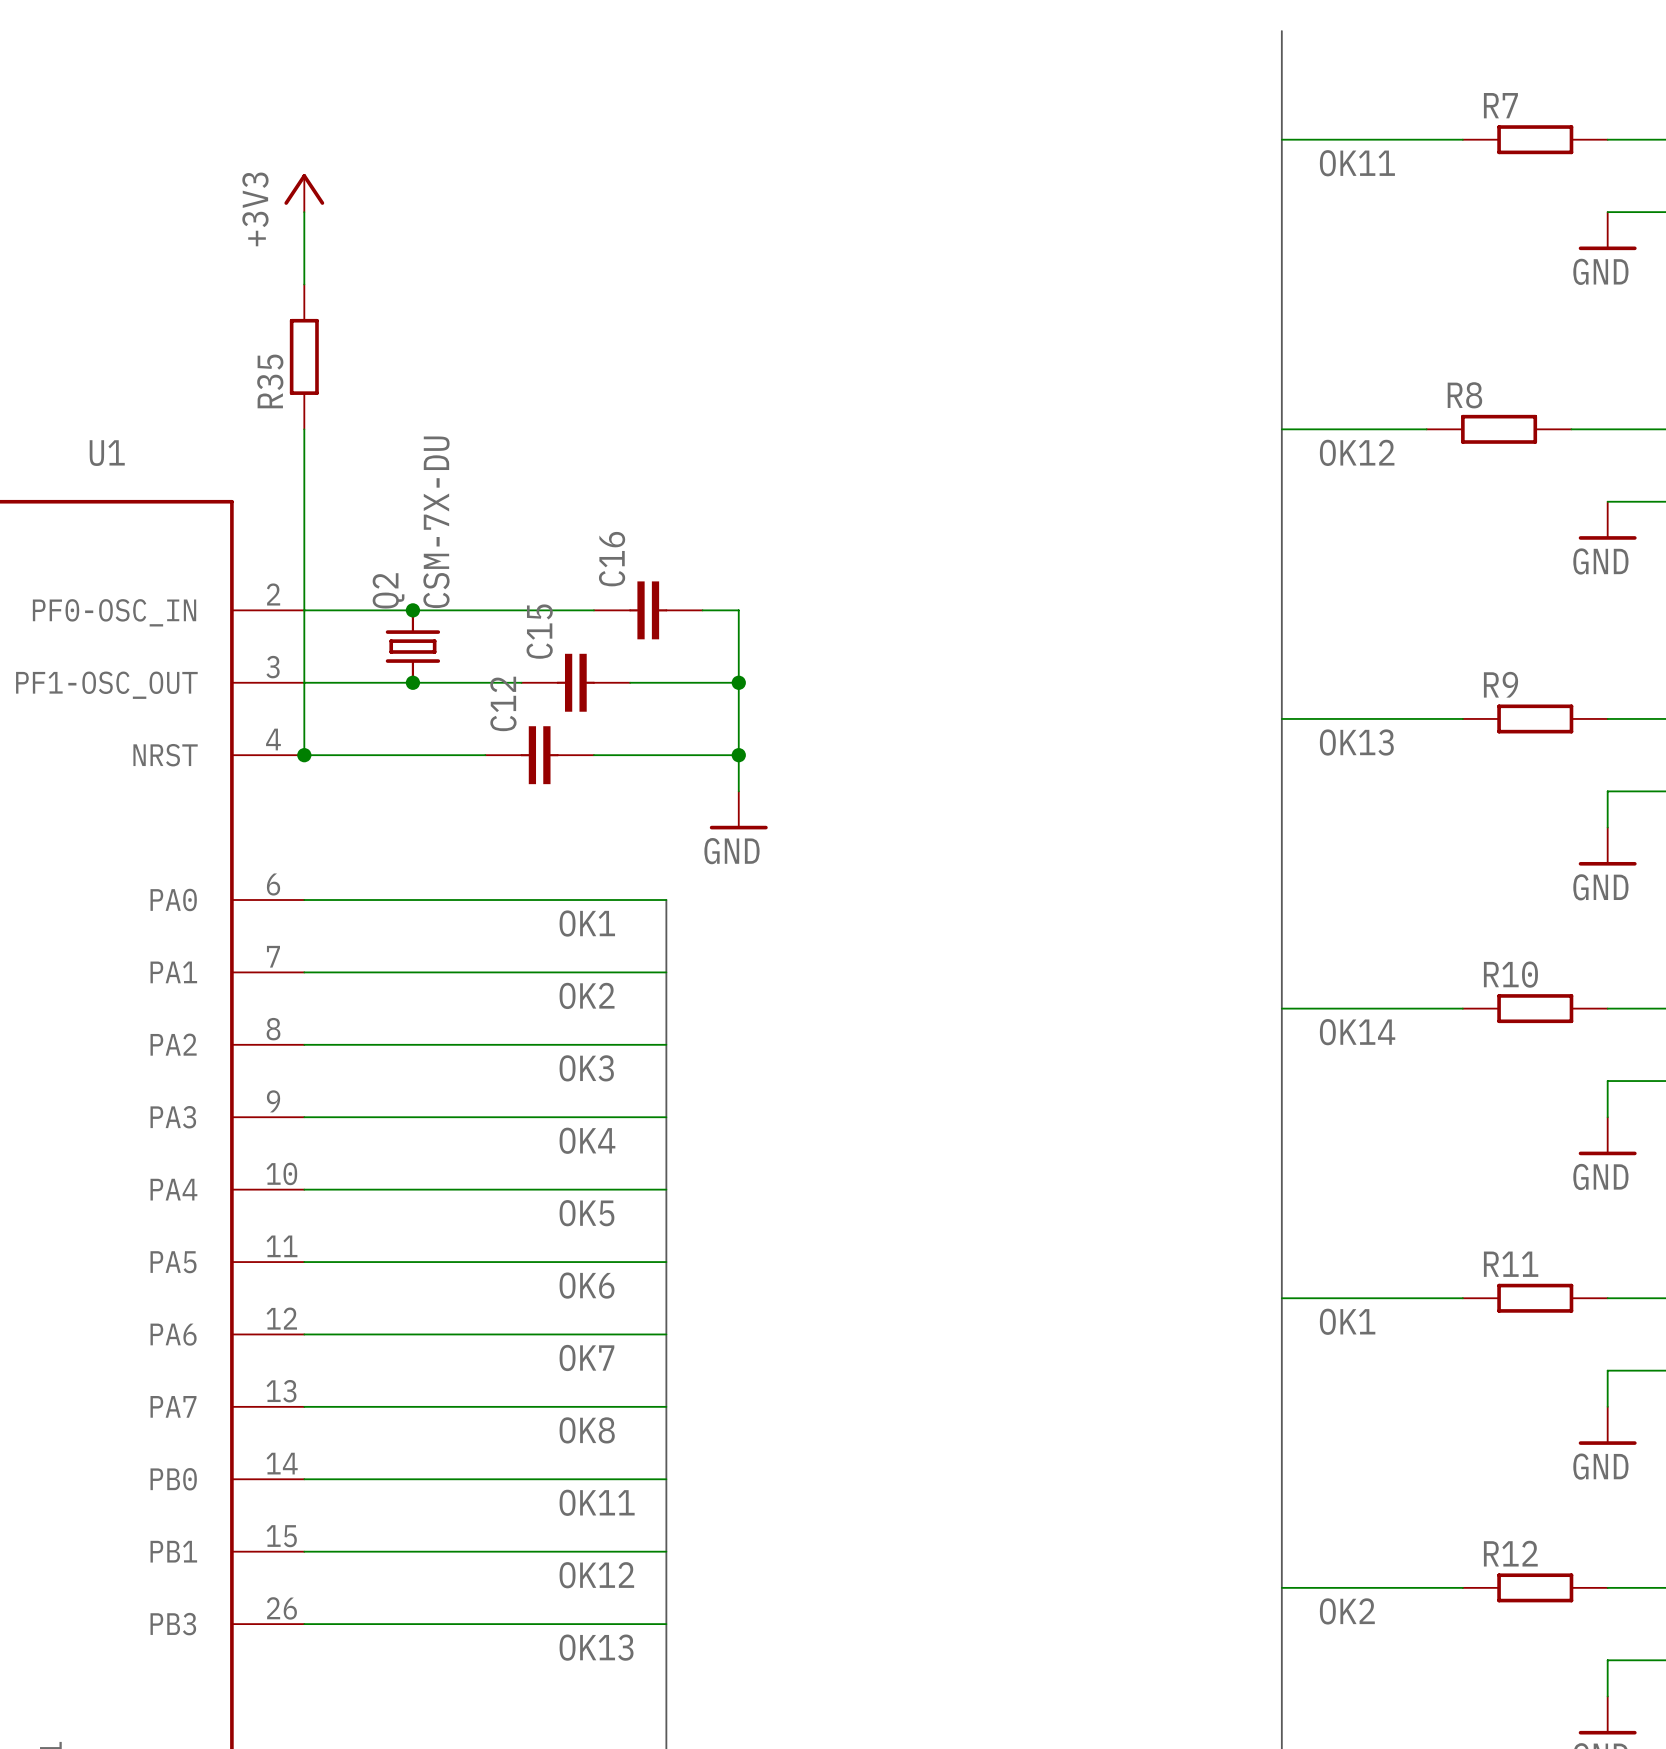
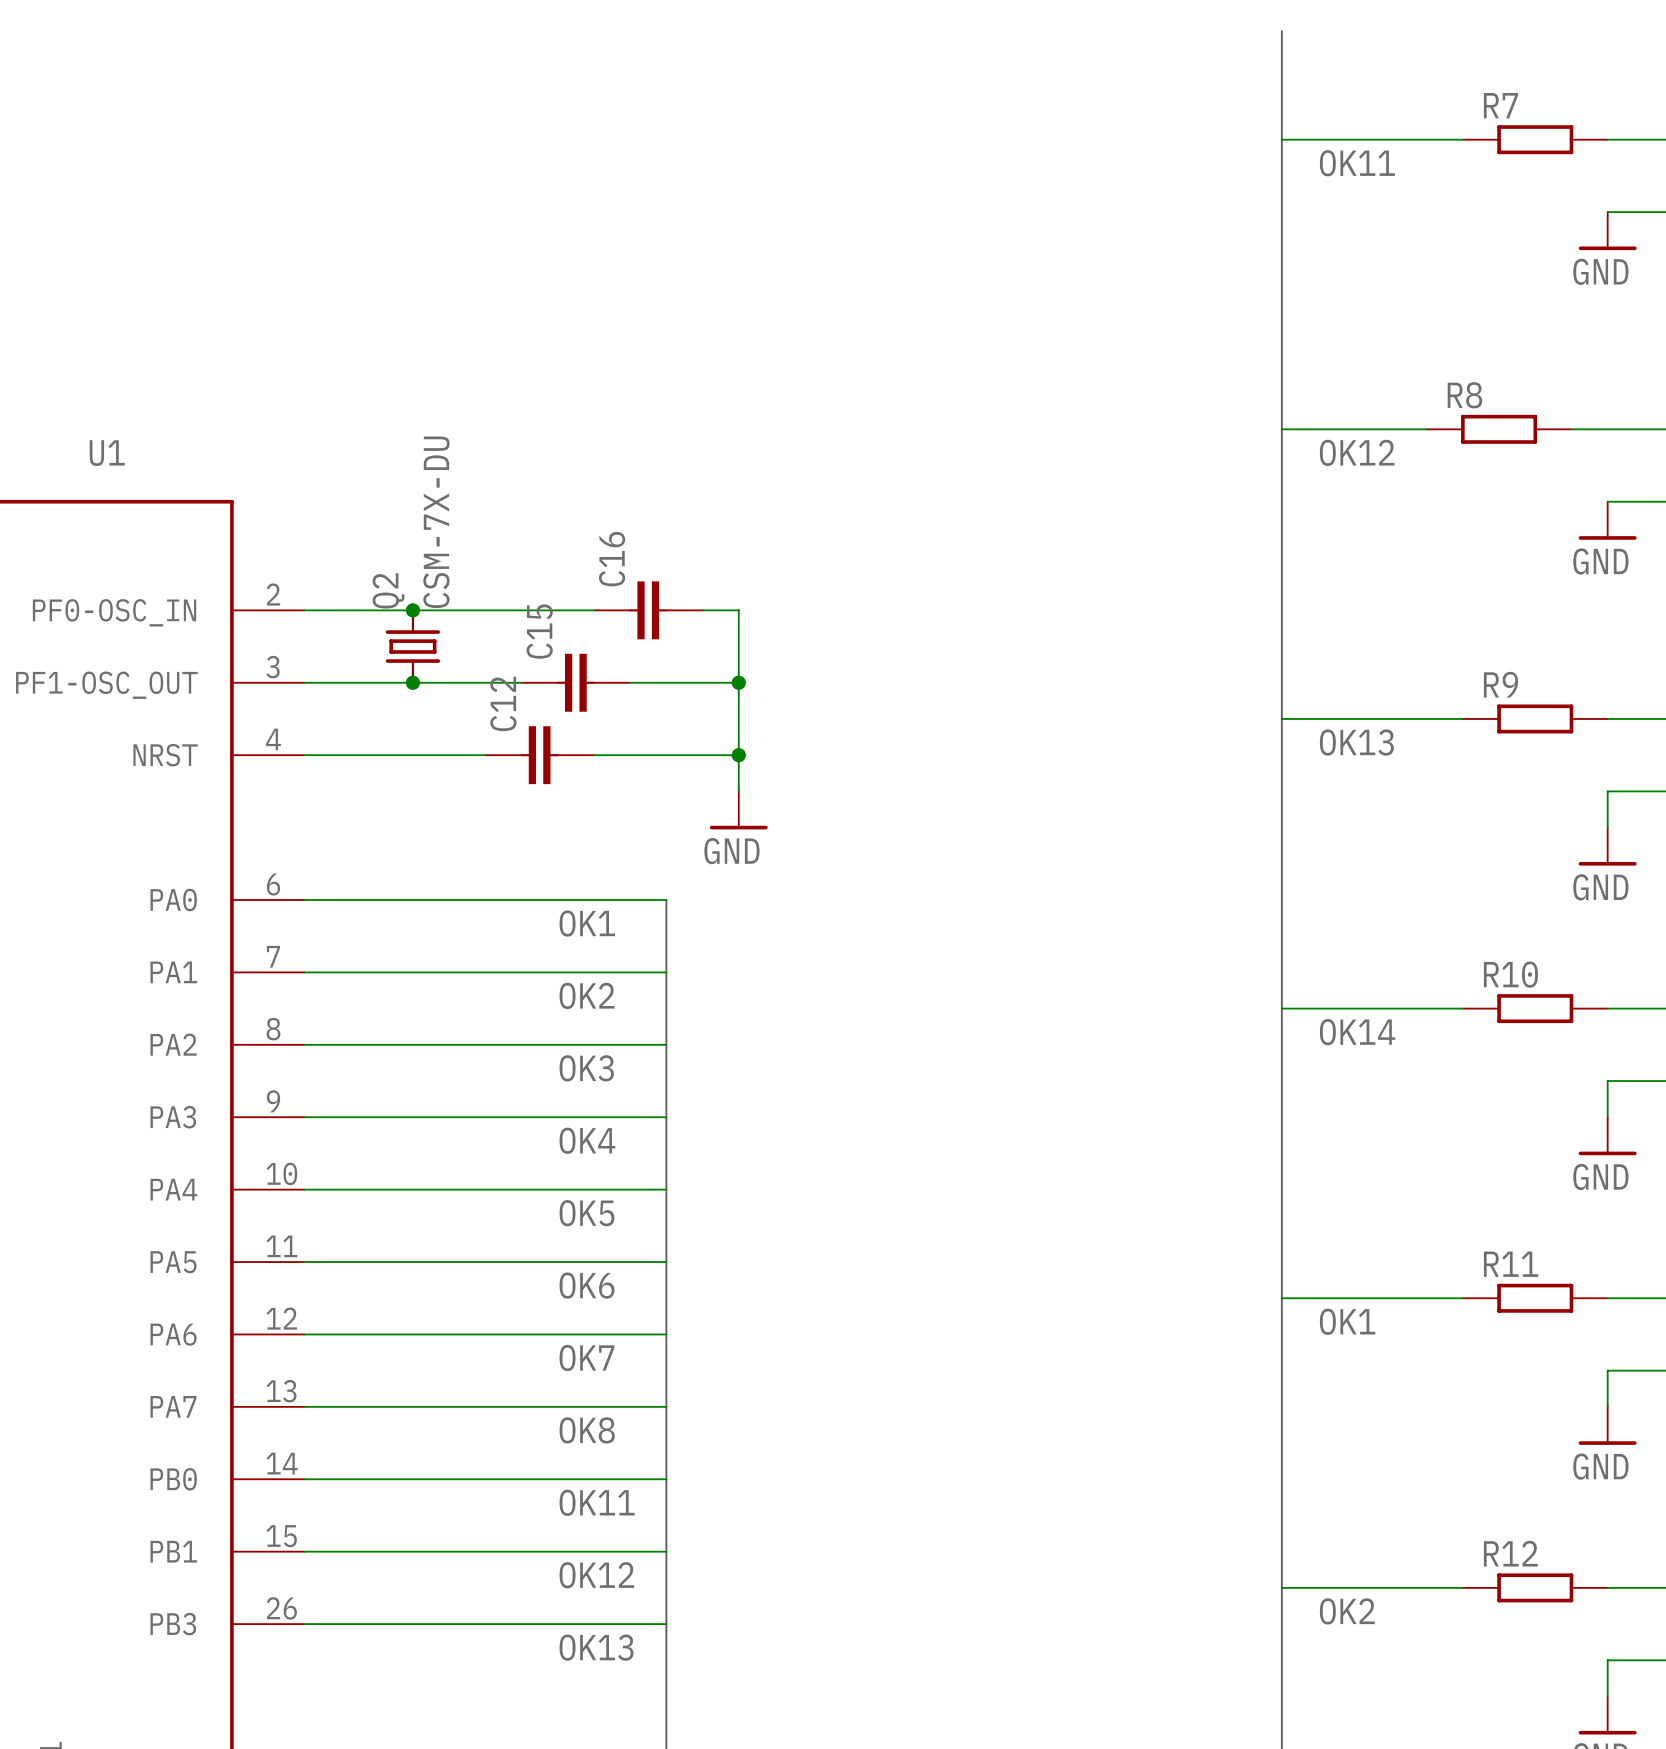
power symbol: +3V3 (304, 193) -> none
wire: (304, 212) (304, 284) -> none
R35: (304, 356) -> none
wire: (304, 429) (304, 755) -> none
junction: (304, 755) -> none

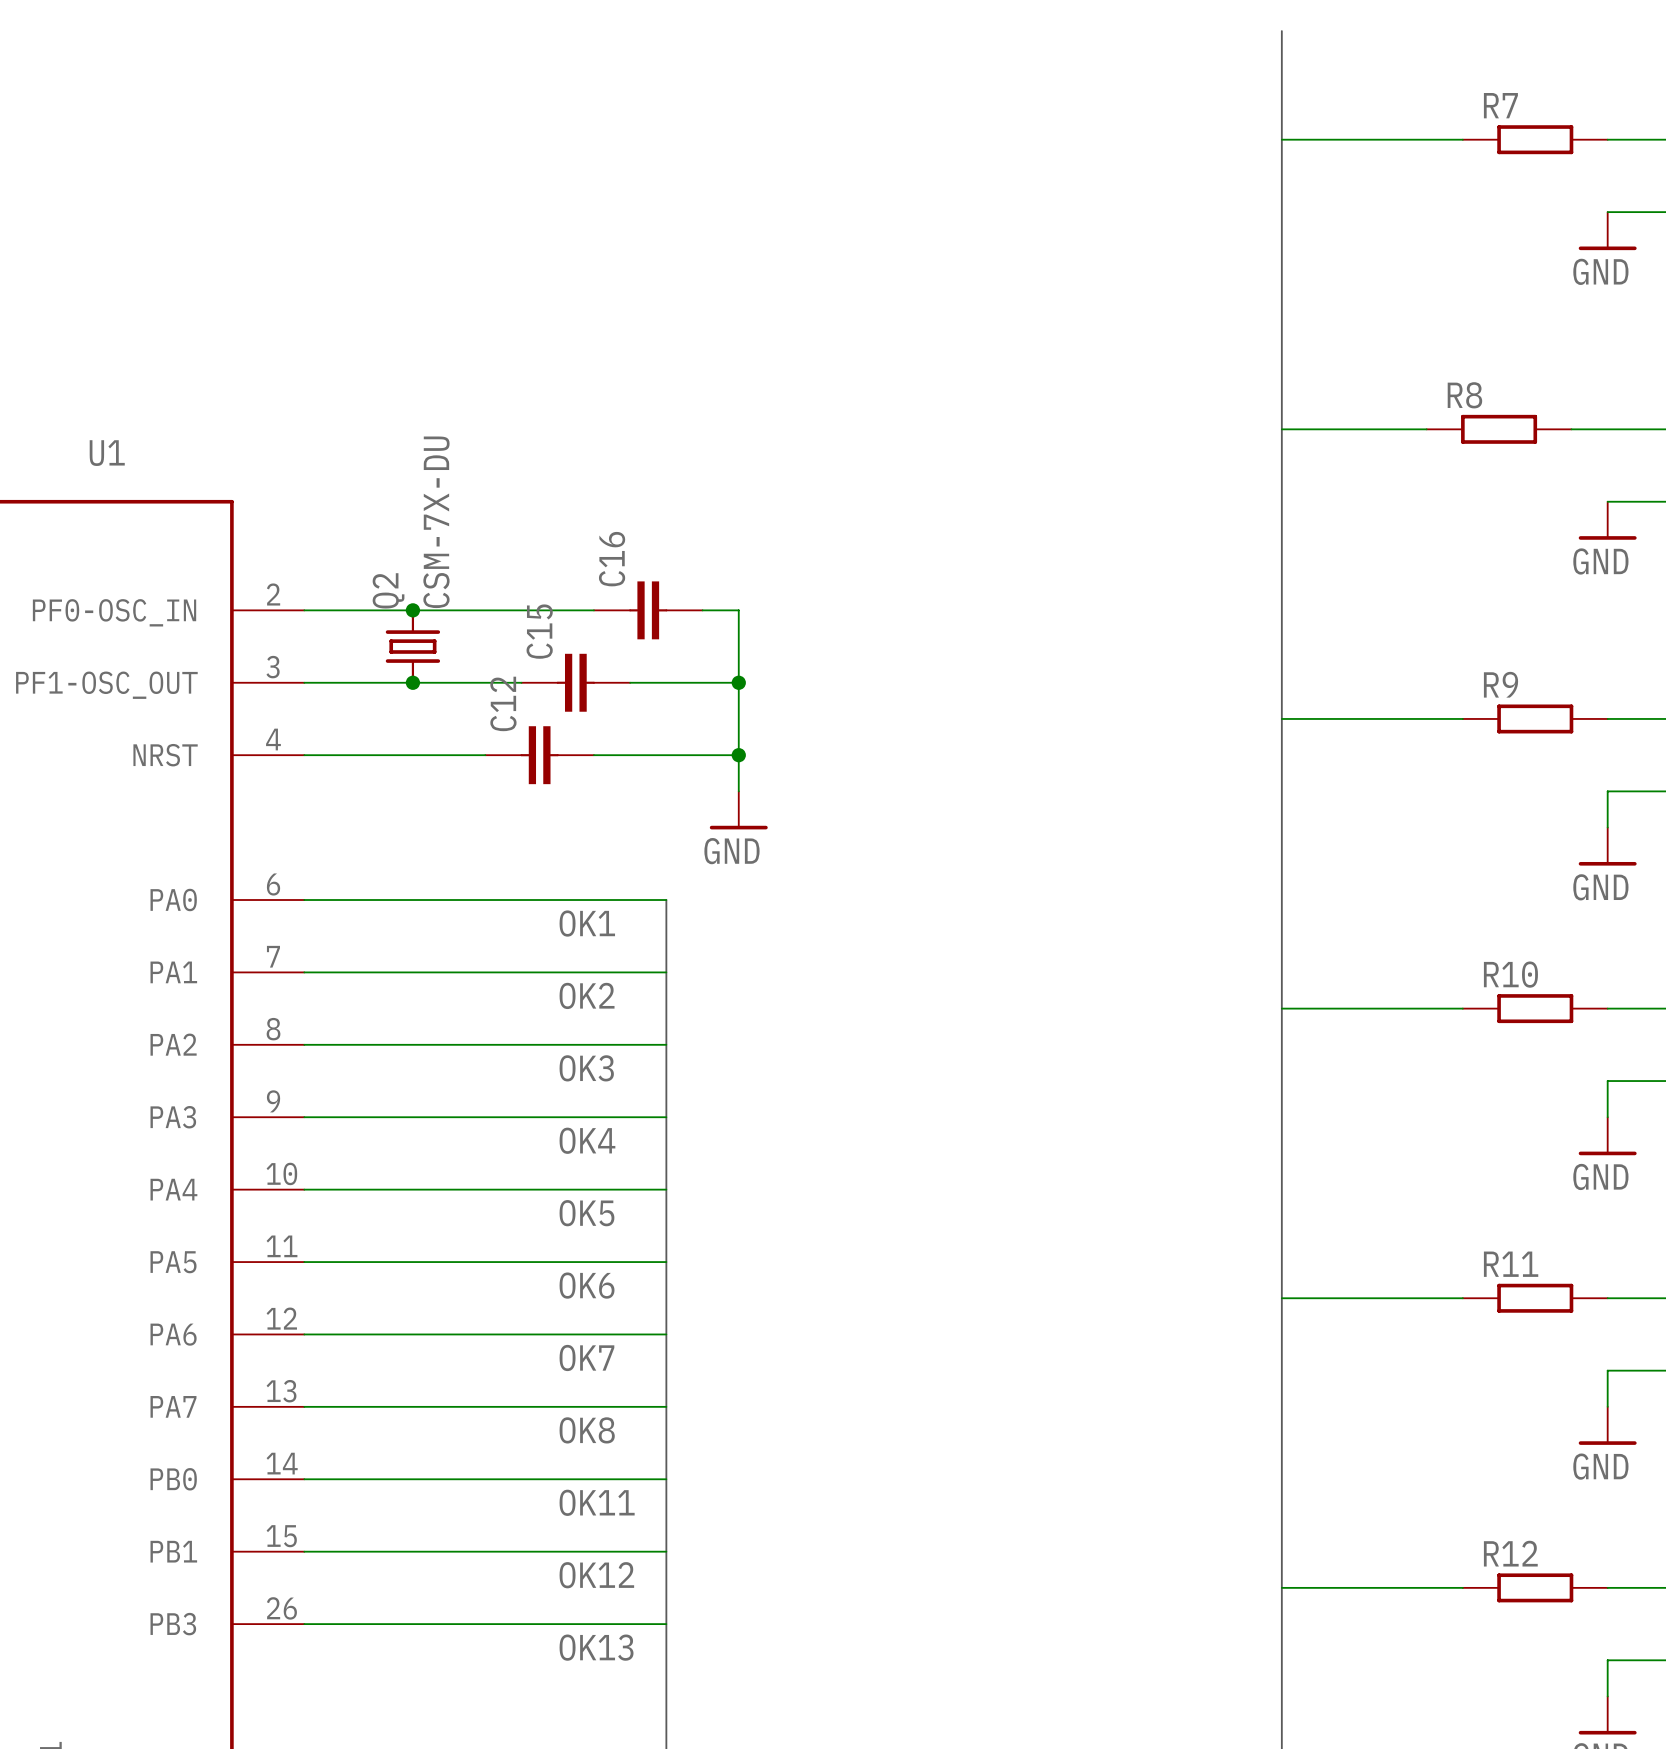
label: OK11 (1357, 163) -> none
label: OK12 (1357, 452) -> none
label: OK13 (1356, 742) -> none
label: OK14 (1357, 1032) -> none
label: OK1 (1347, 1321) -> none
label: OK2 (1347, 1611) -> none

